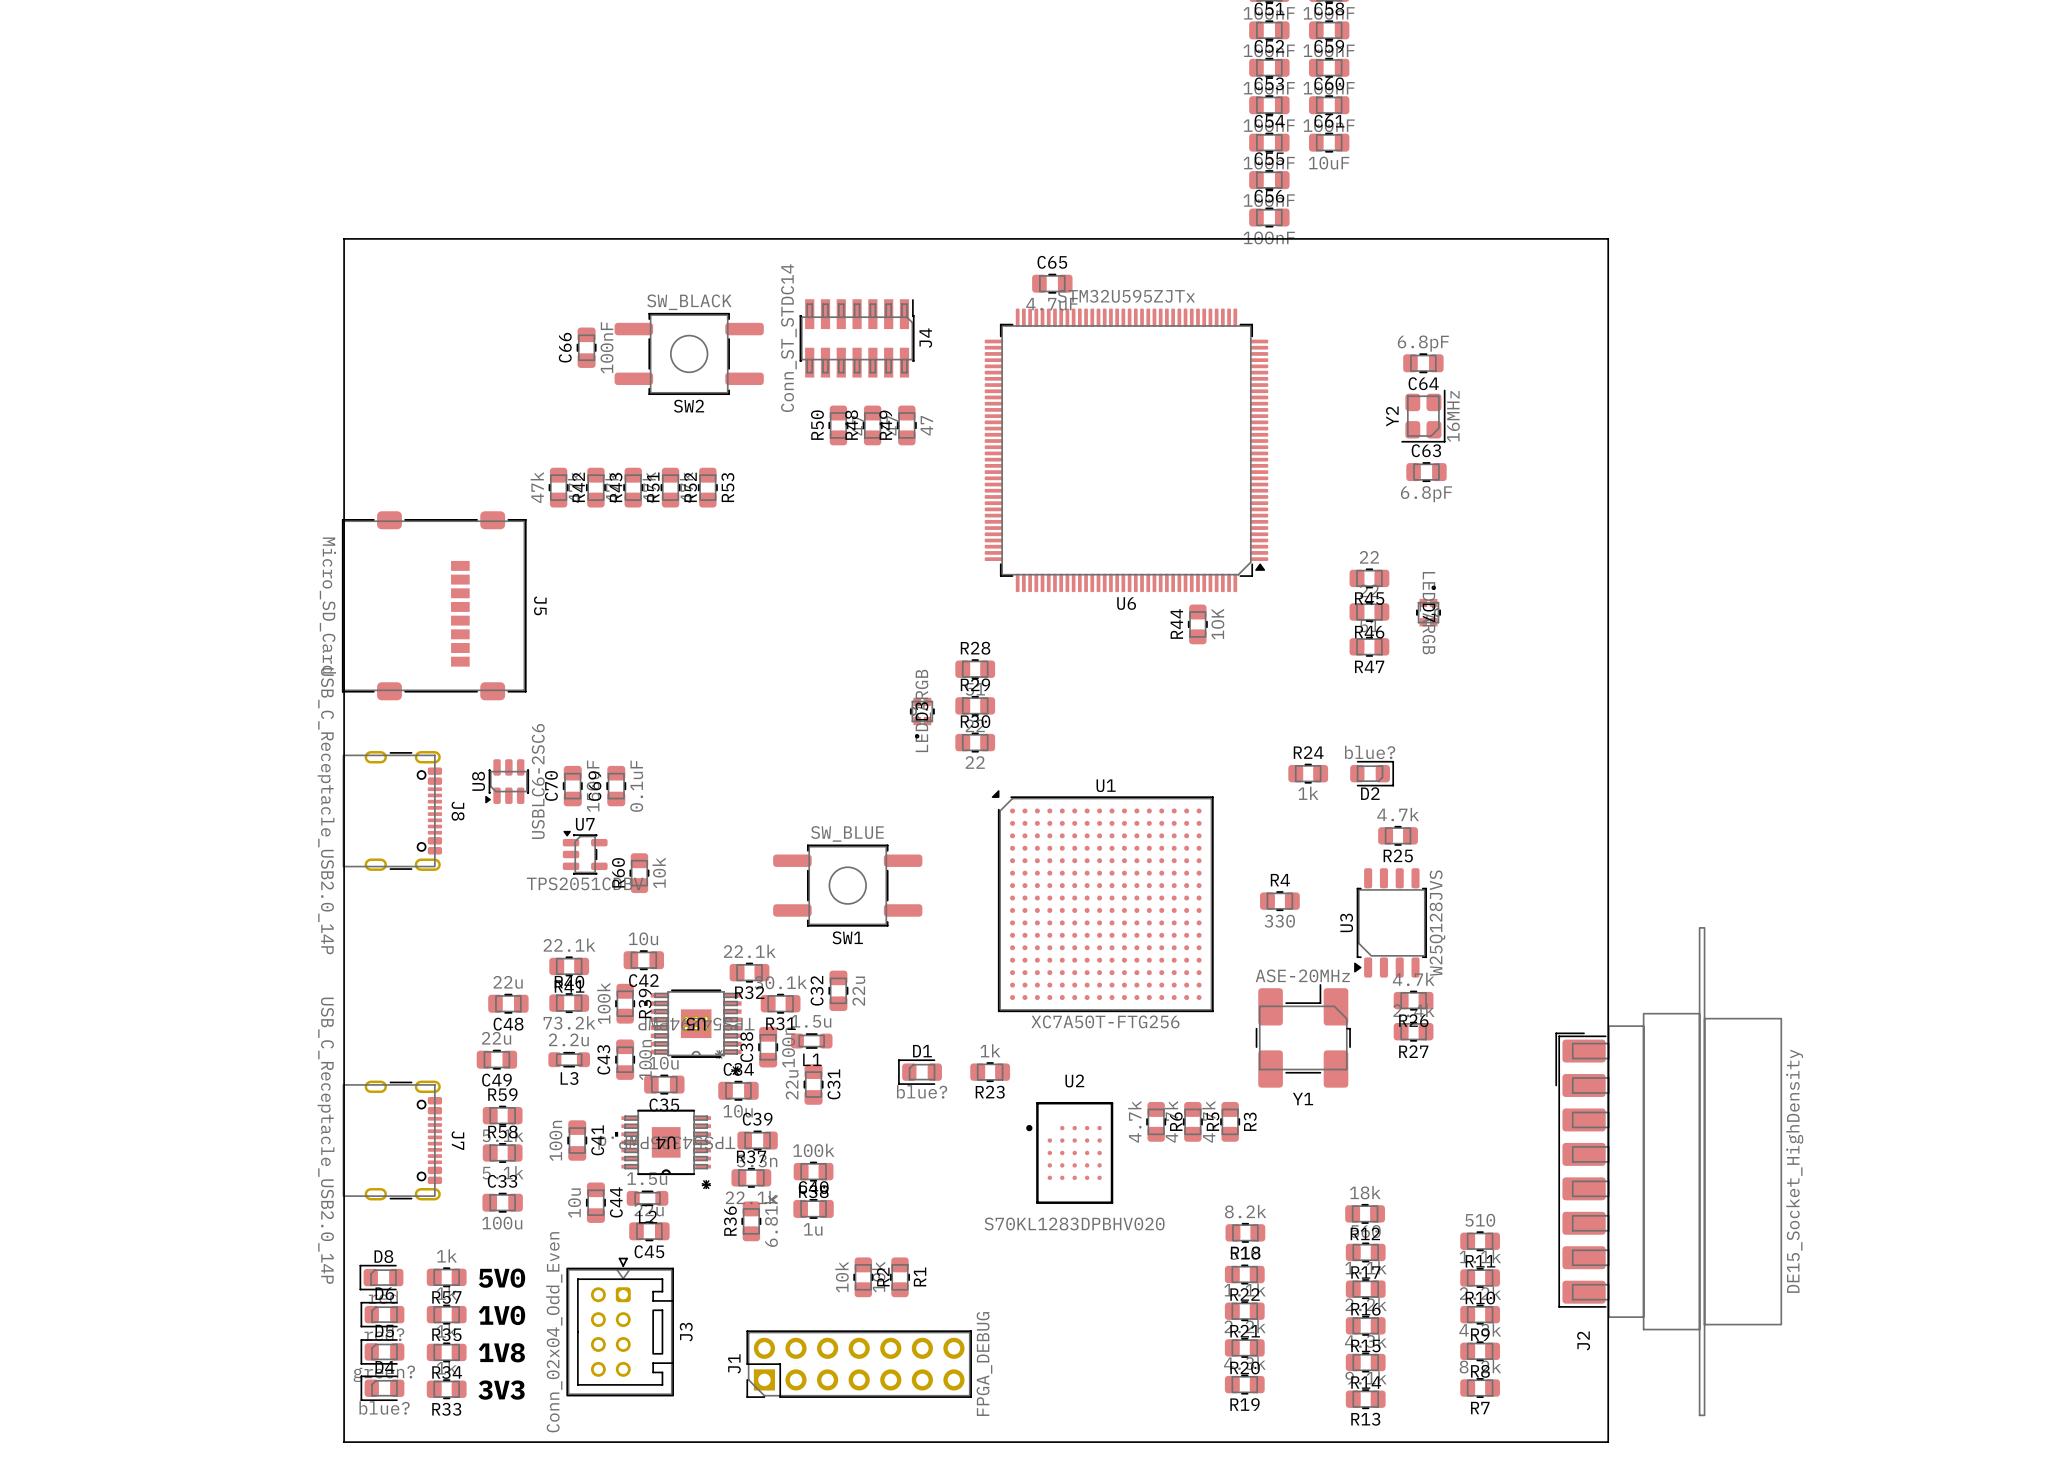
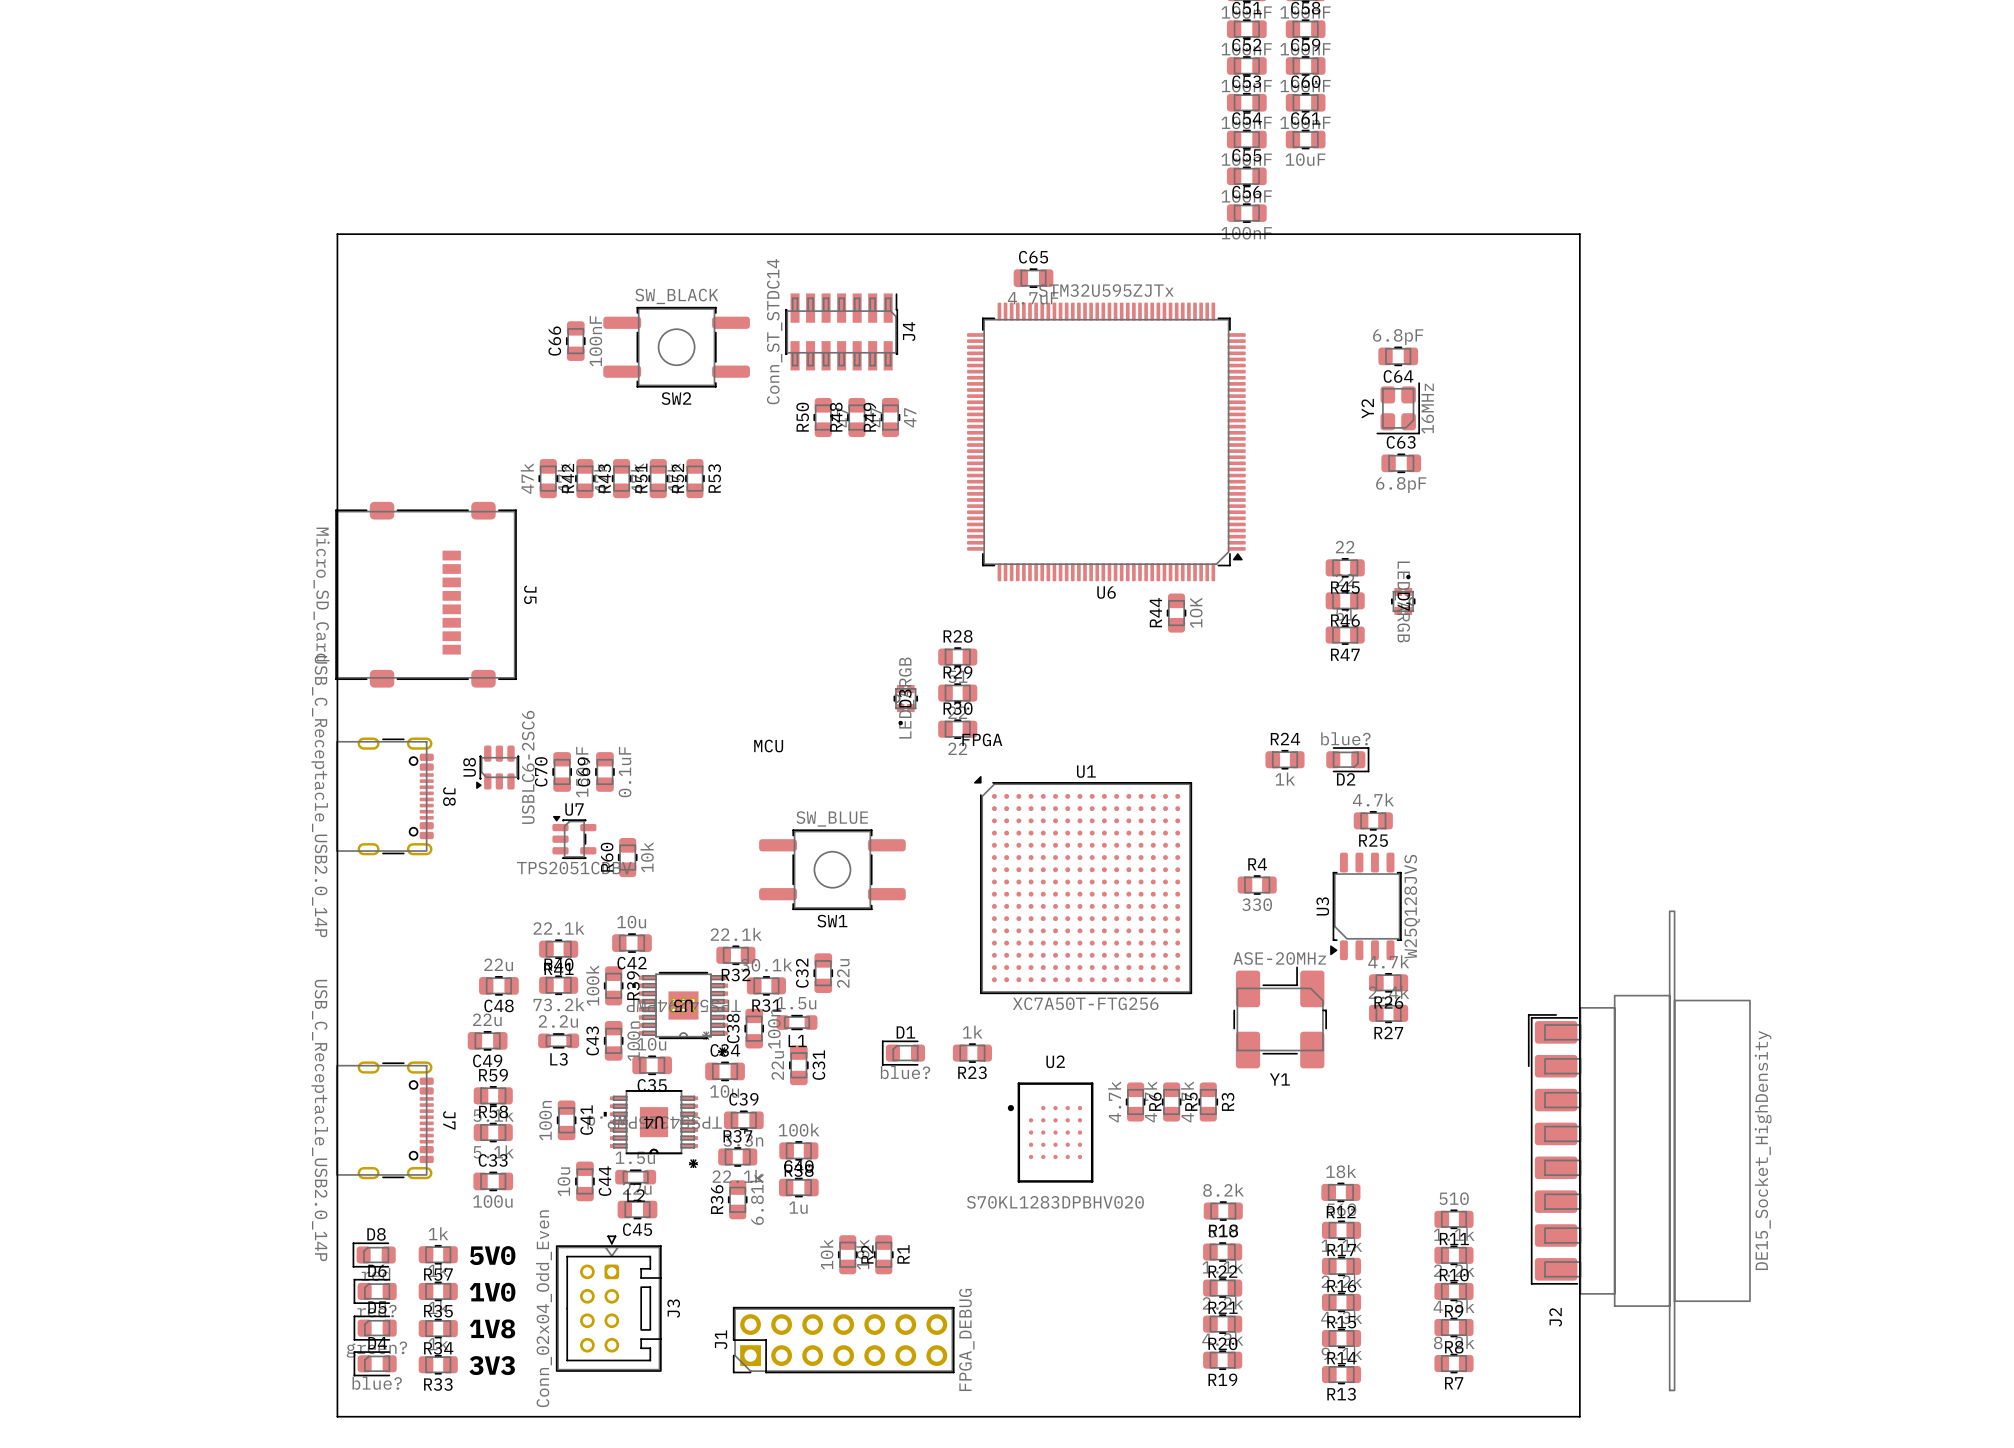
text: none -> FPGA (982, 739)
text: none -> MCU (768, 746)

